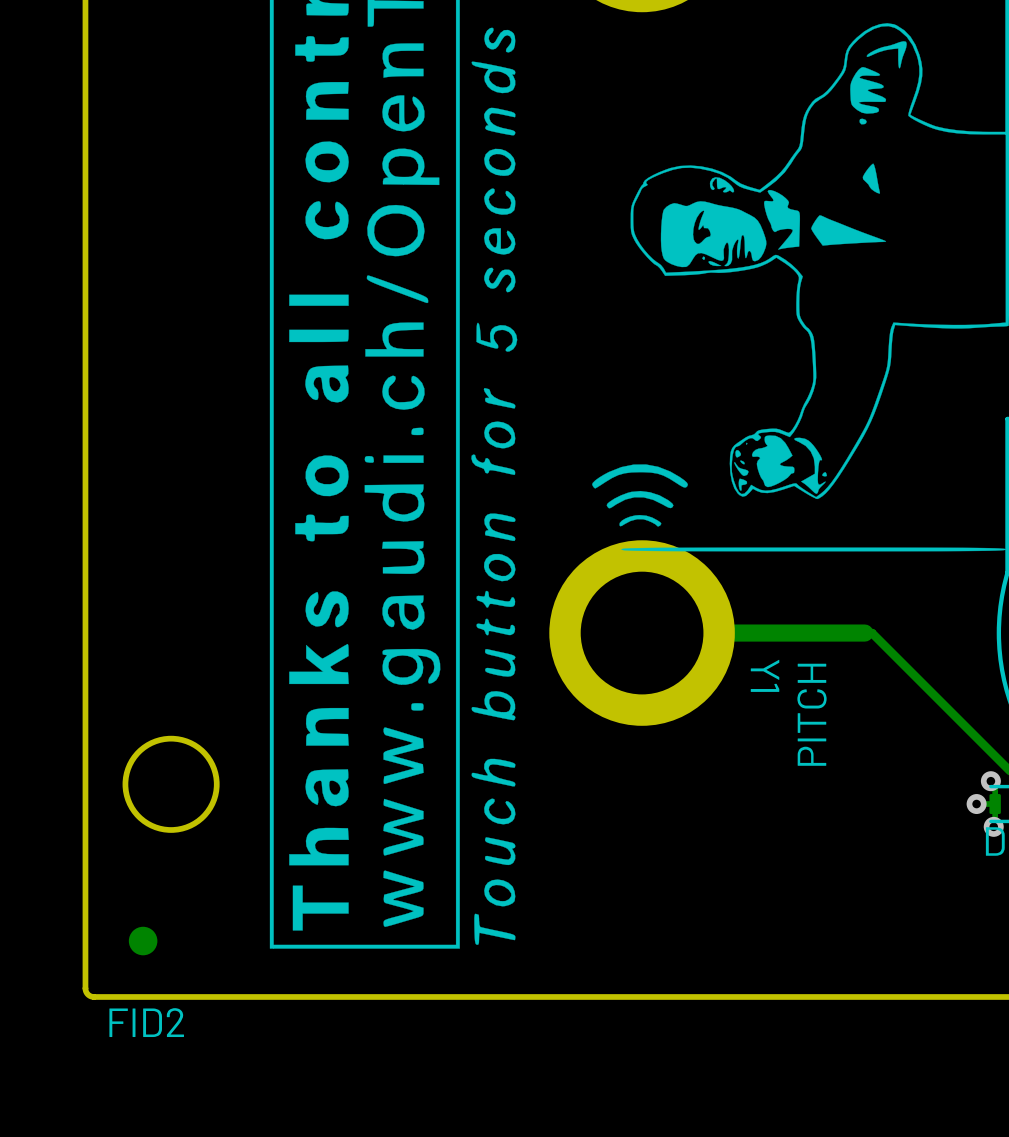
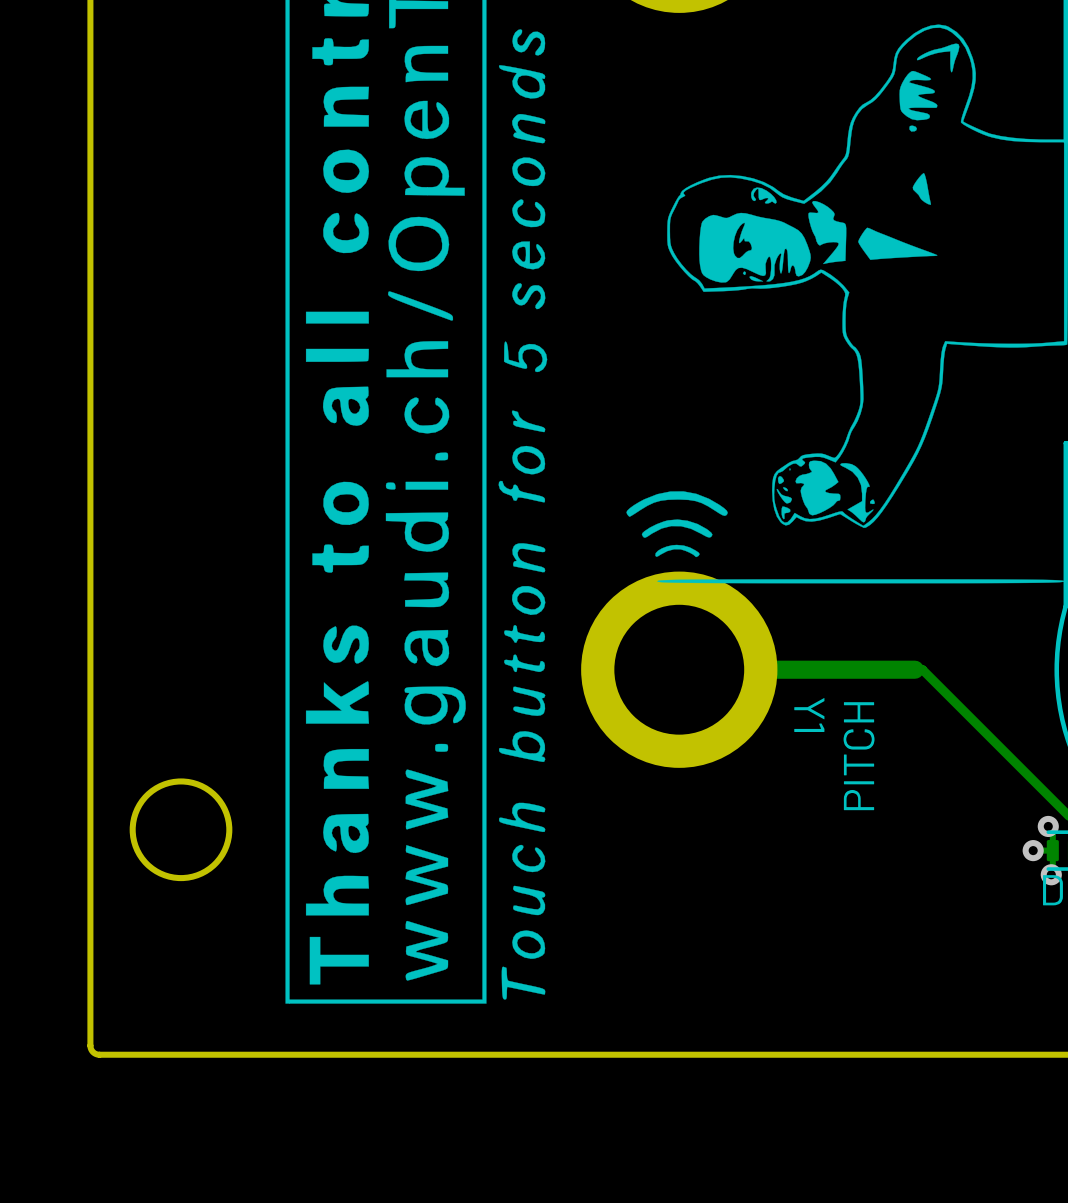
FID2: (143, 941) -> none

